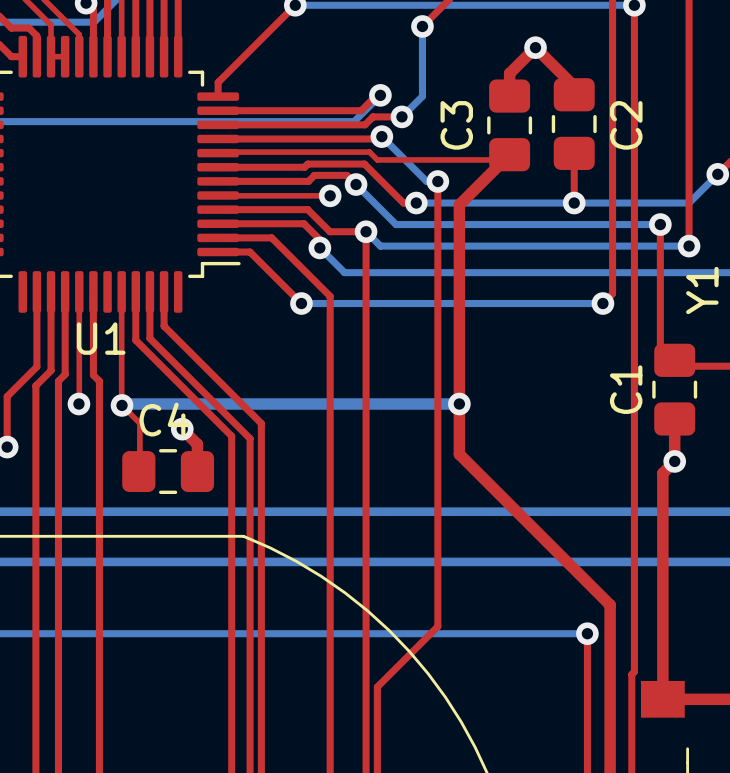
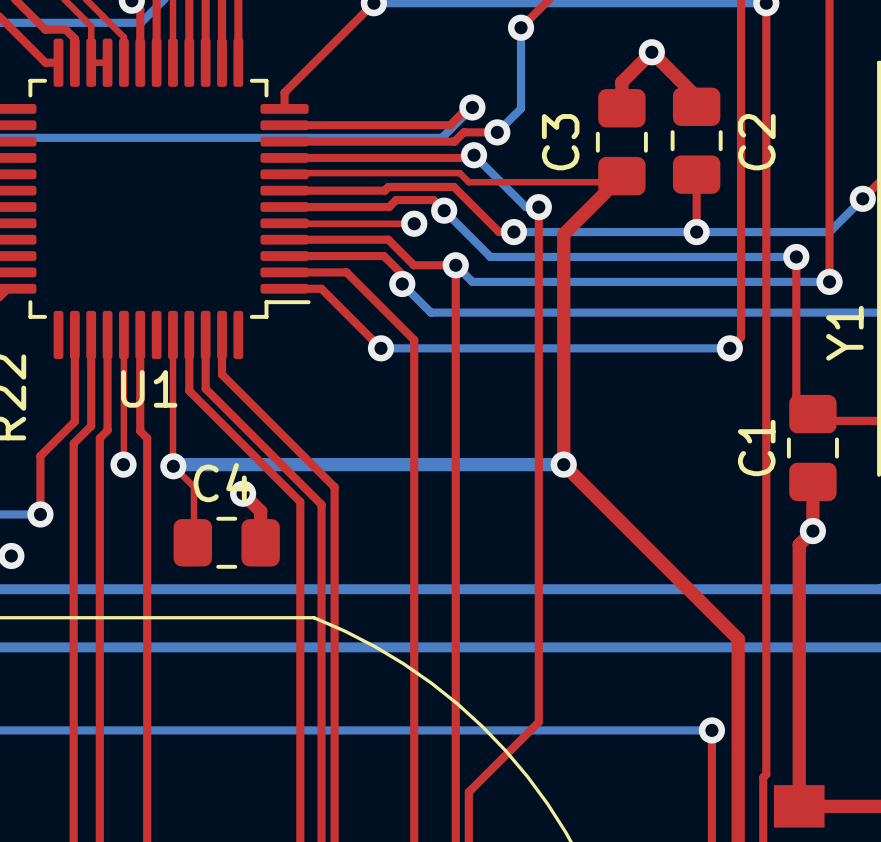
top track: (459, 404) (459, 454) (610, 604) -> (563, 464) (738, 639) (738, 697)

